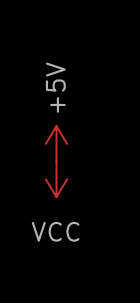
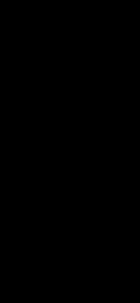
power symbol: +5V (56, 143) -> none
power symbol: VCC (56, 179) -> none

